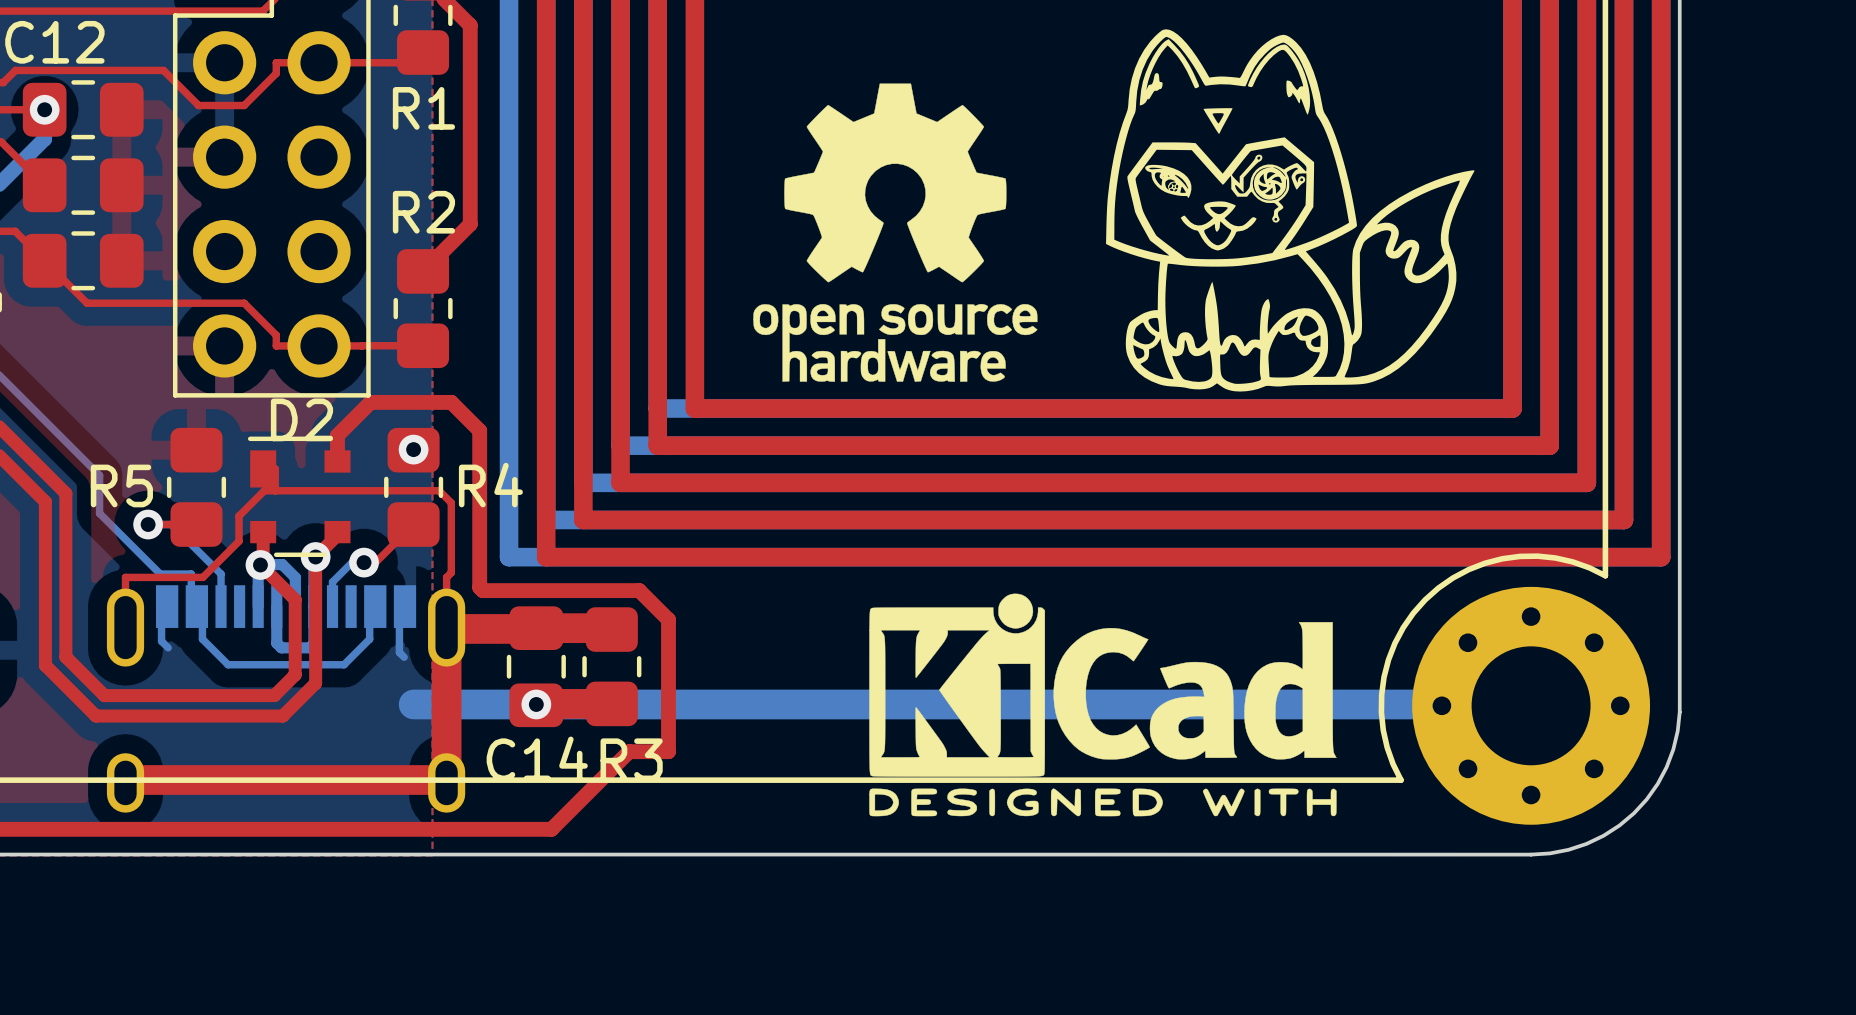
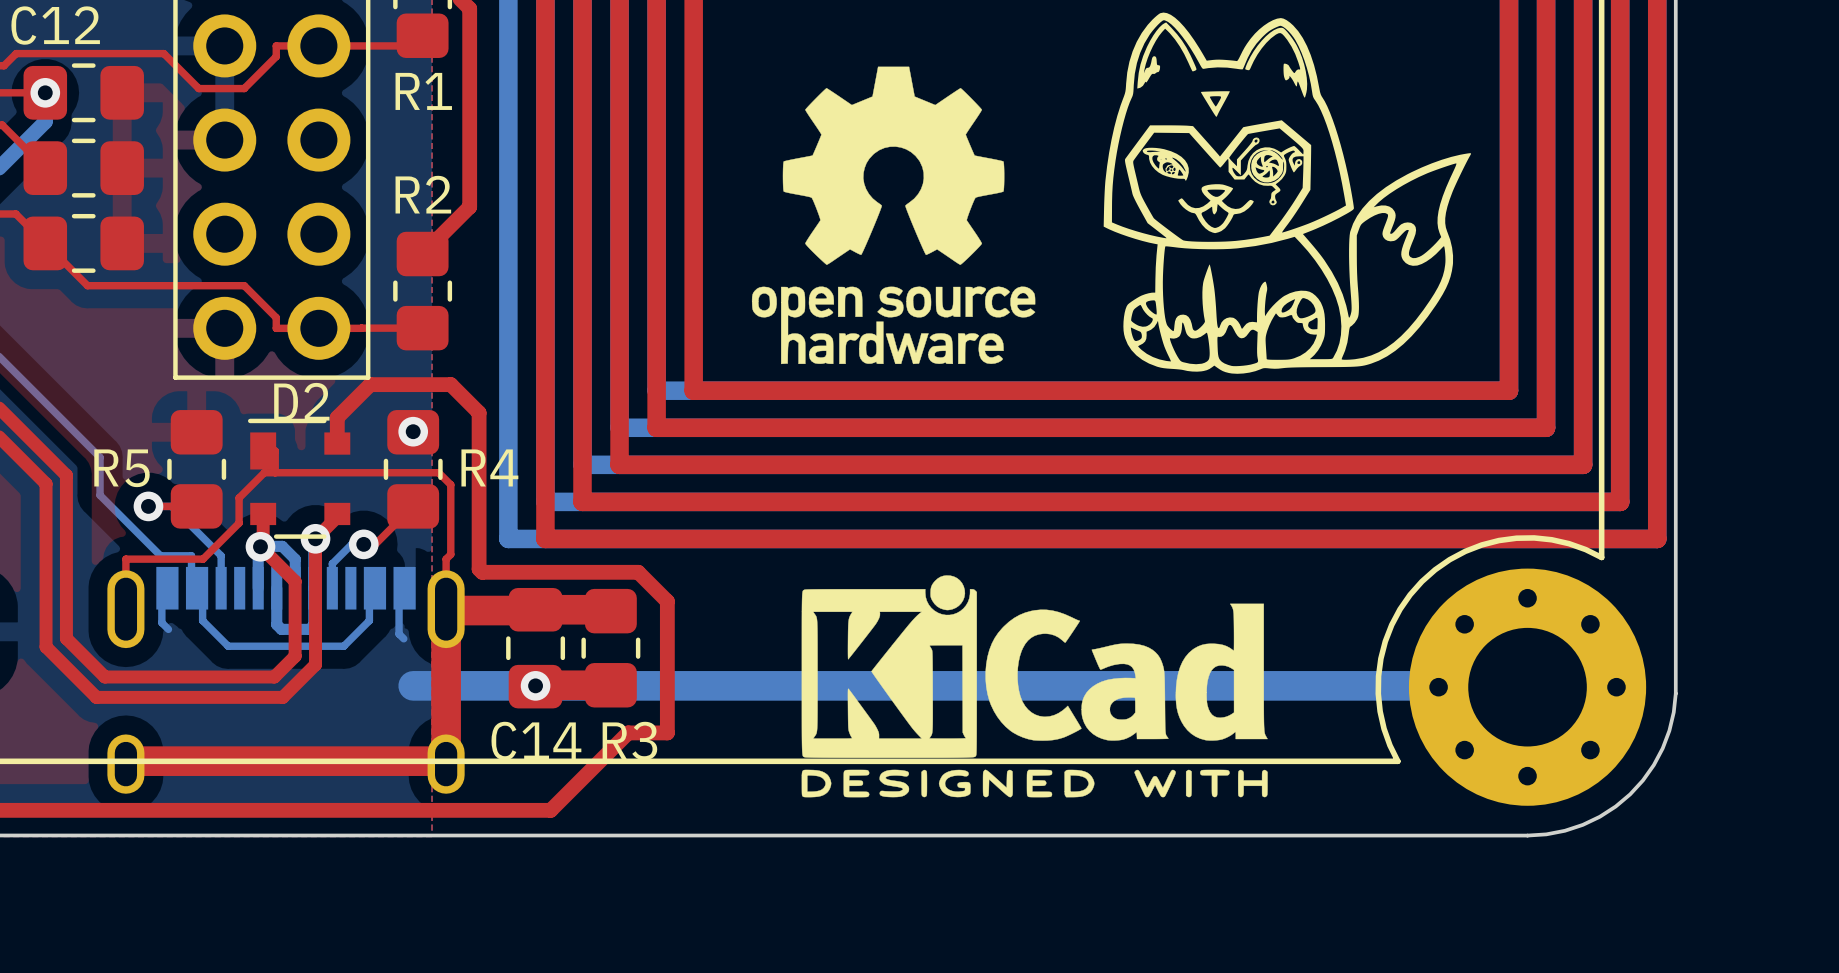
drawing position: (1102, 704) -> (1034, 686)

